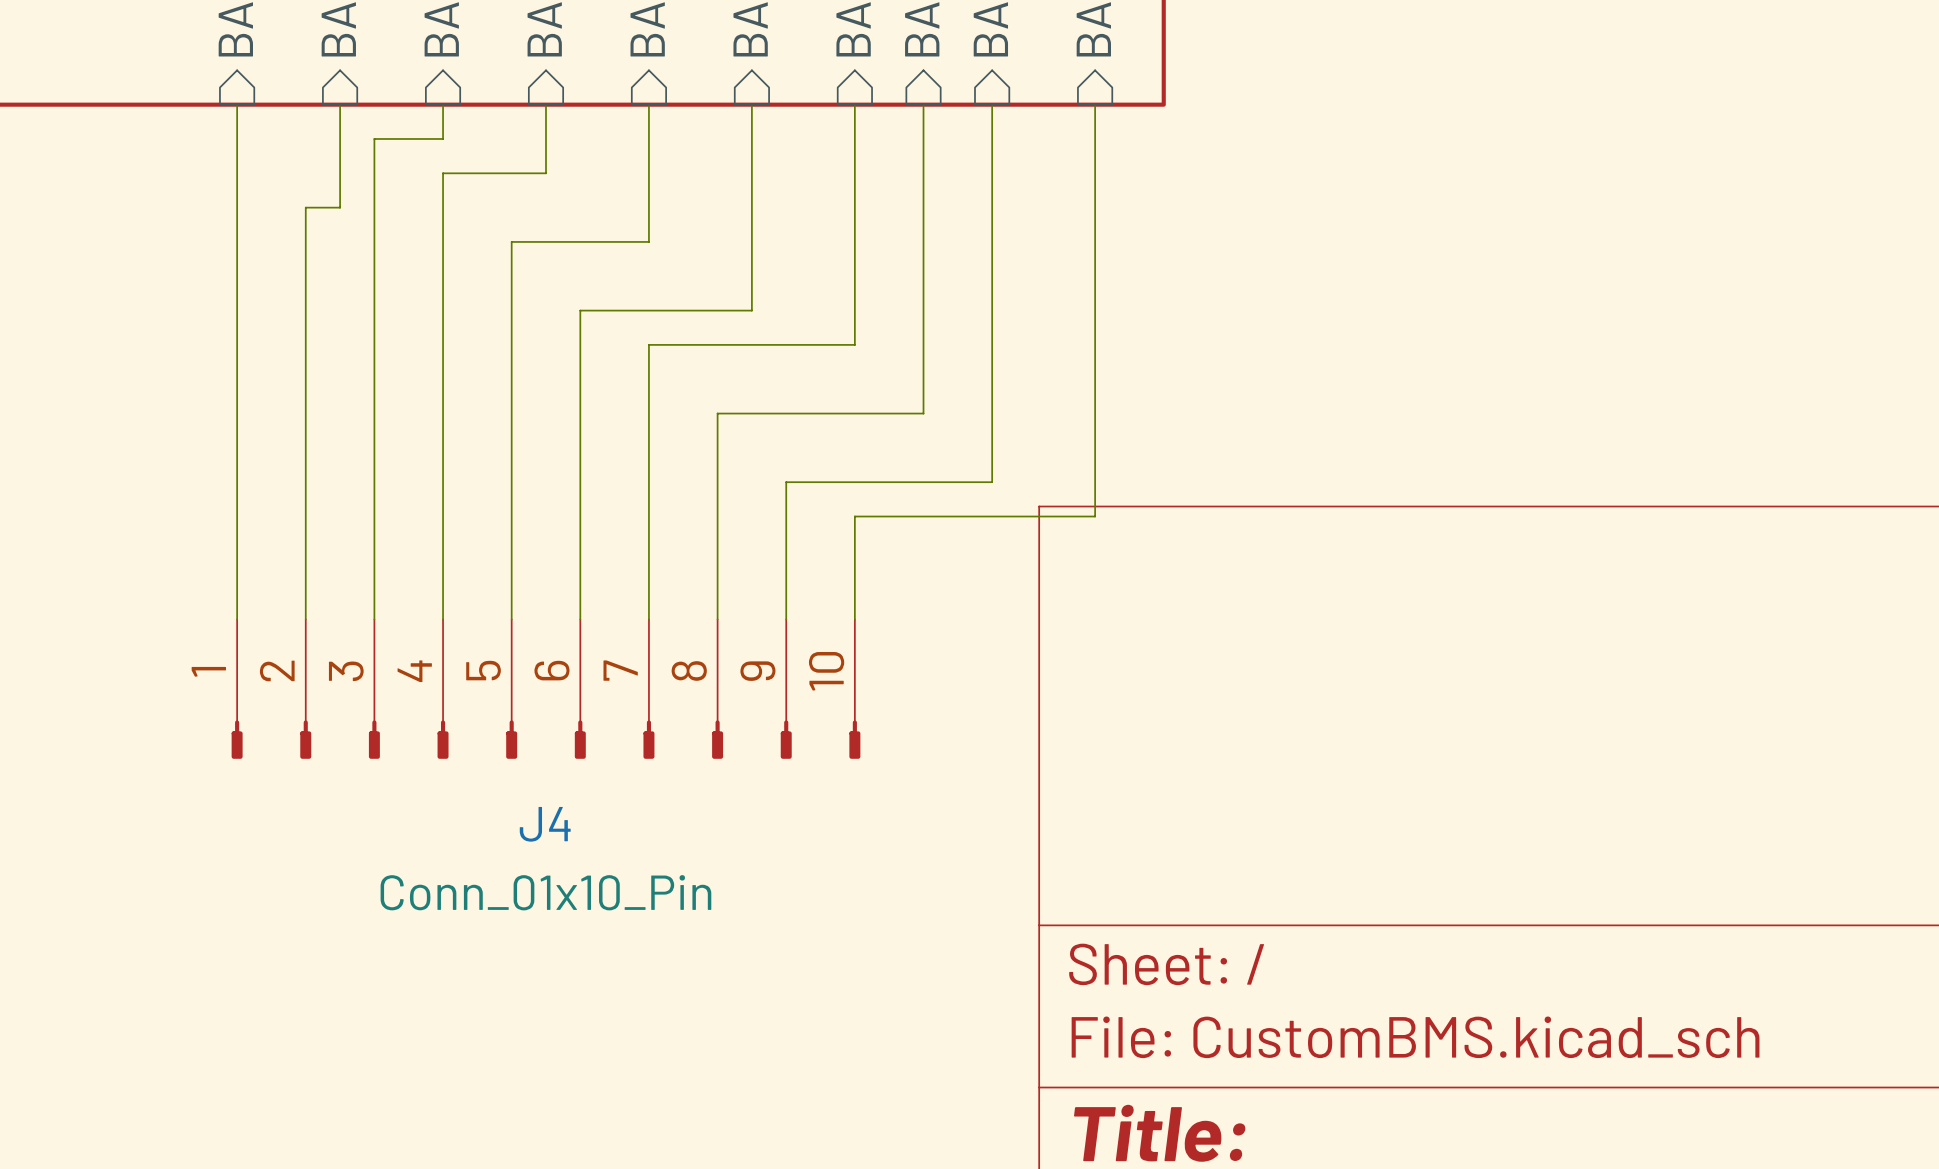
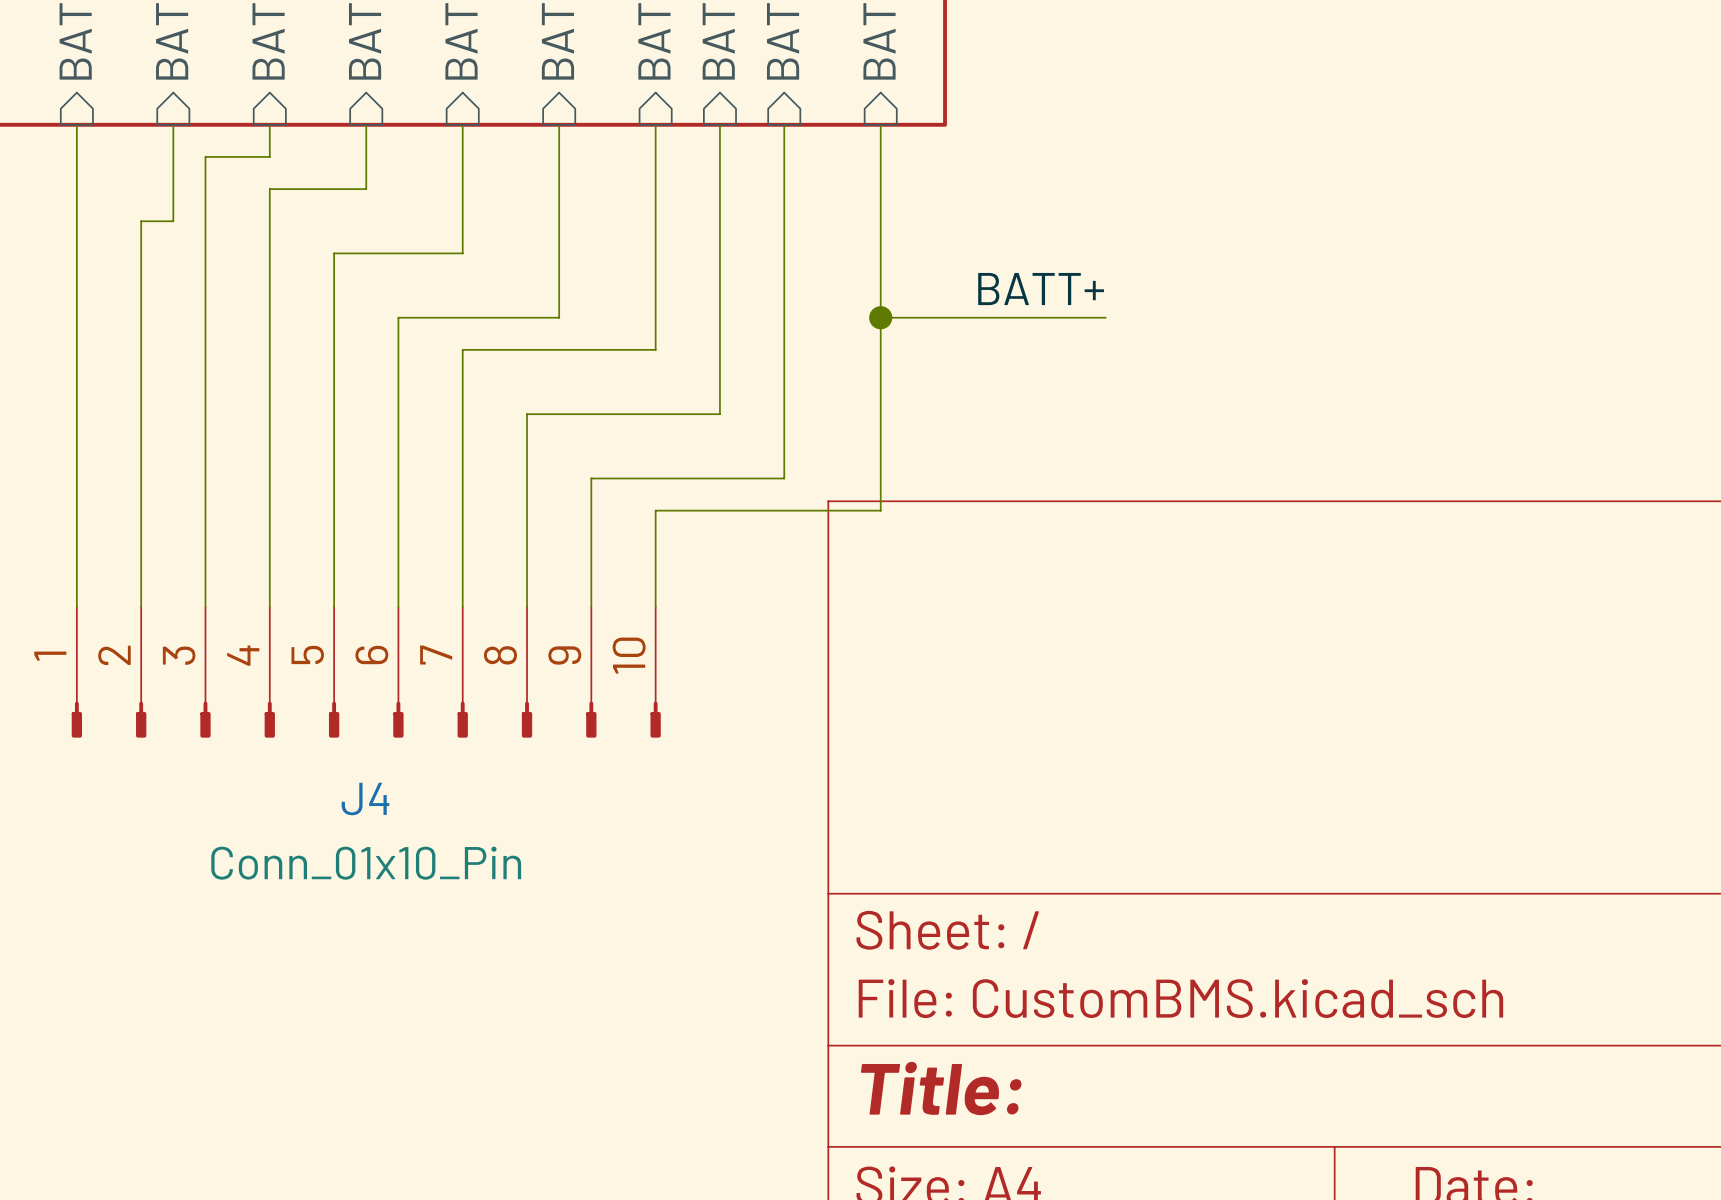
label: none -> BATT+ (1041, 289)
wire: none -> (880, 317) (1105, 317)
junction: none -> (880, 317)

